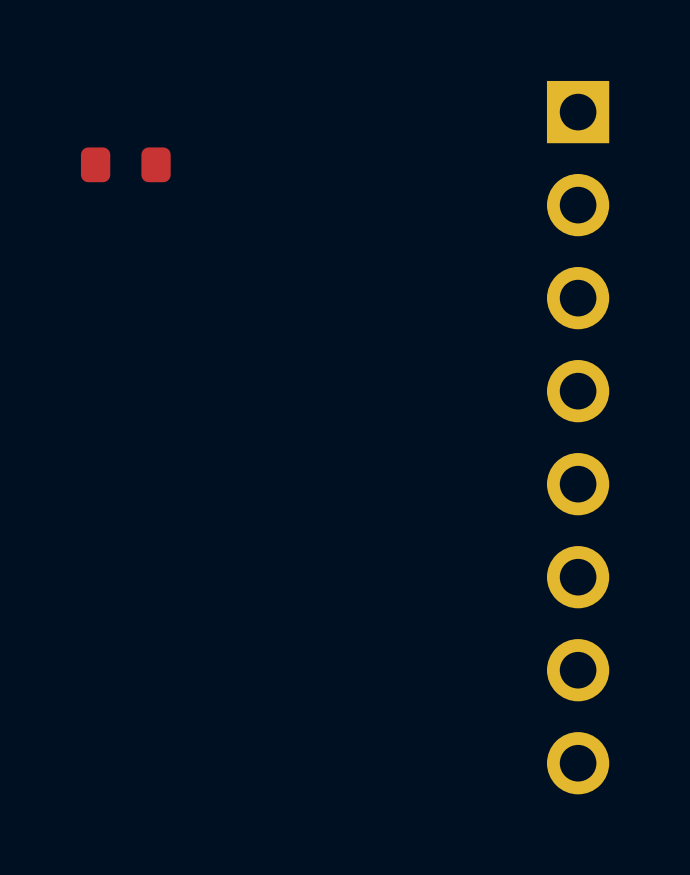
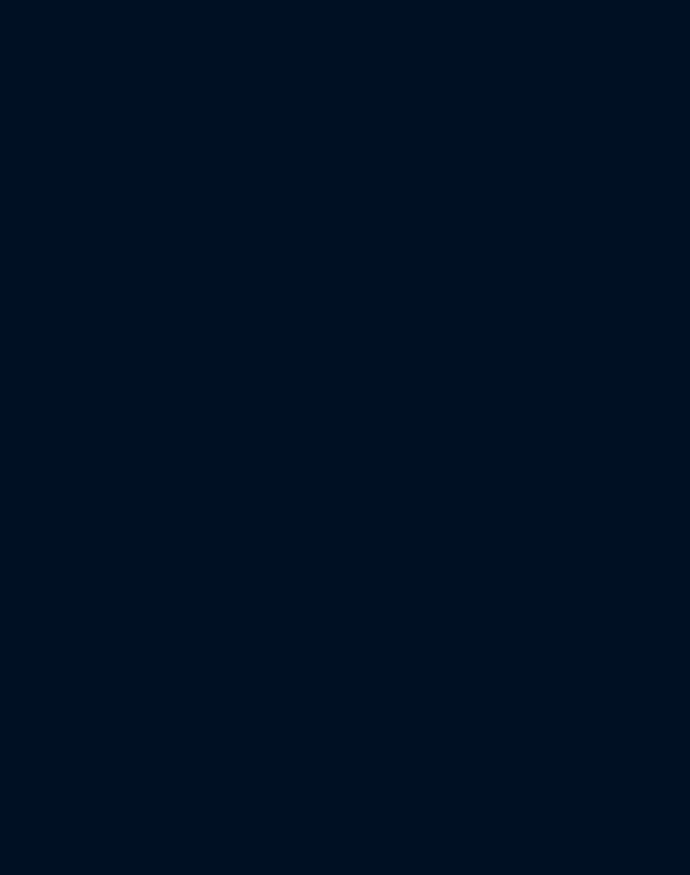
part: (125, 164) -> none
part: (578, 437) -> none

